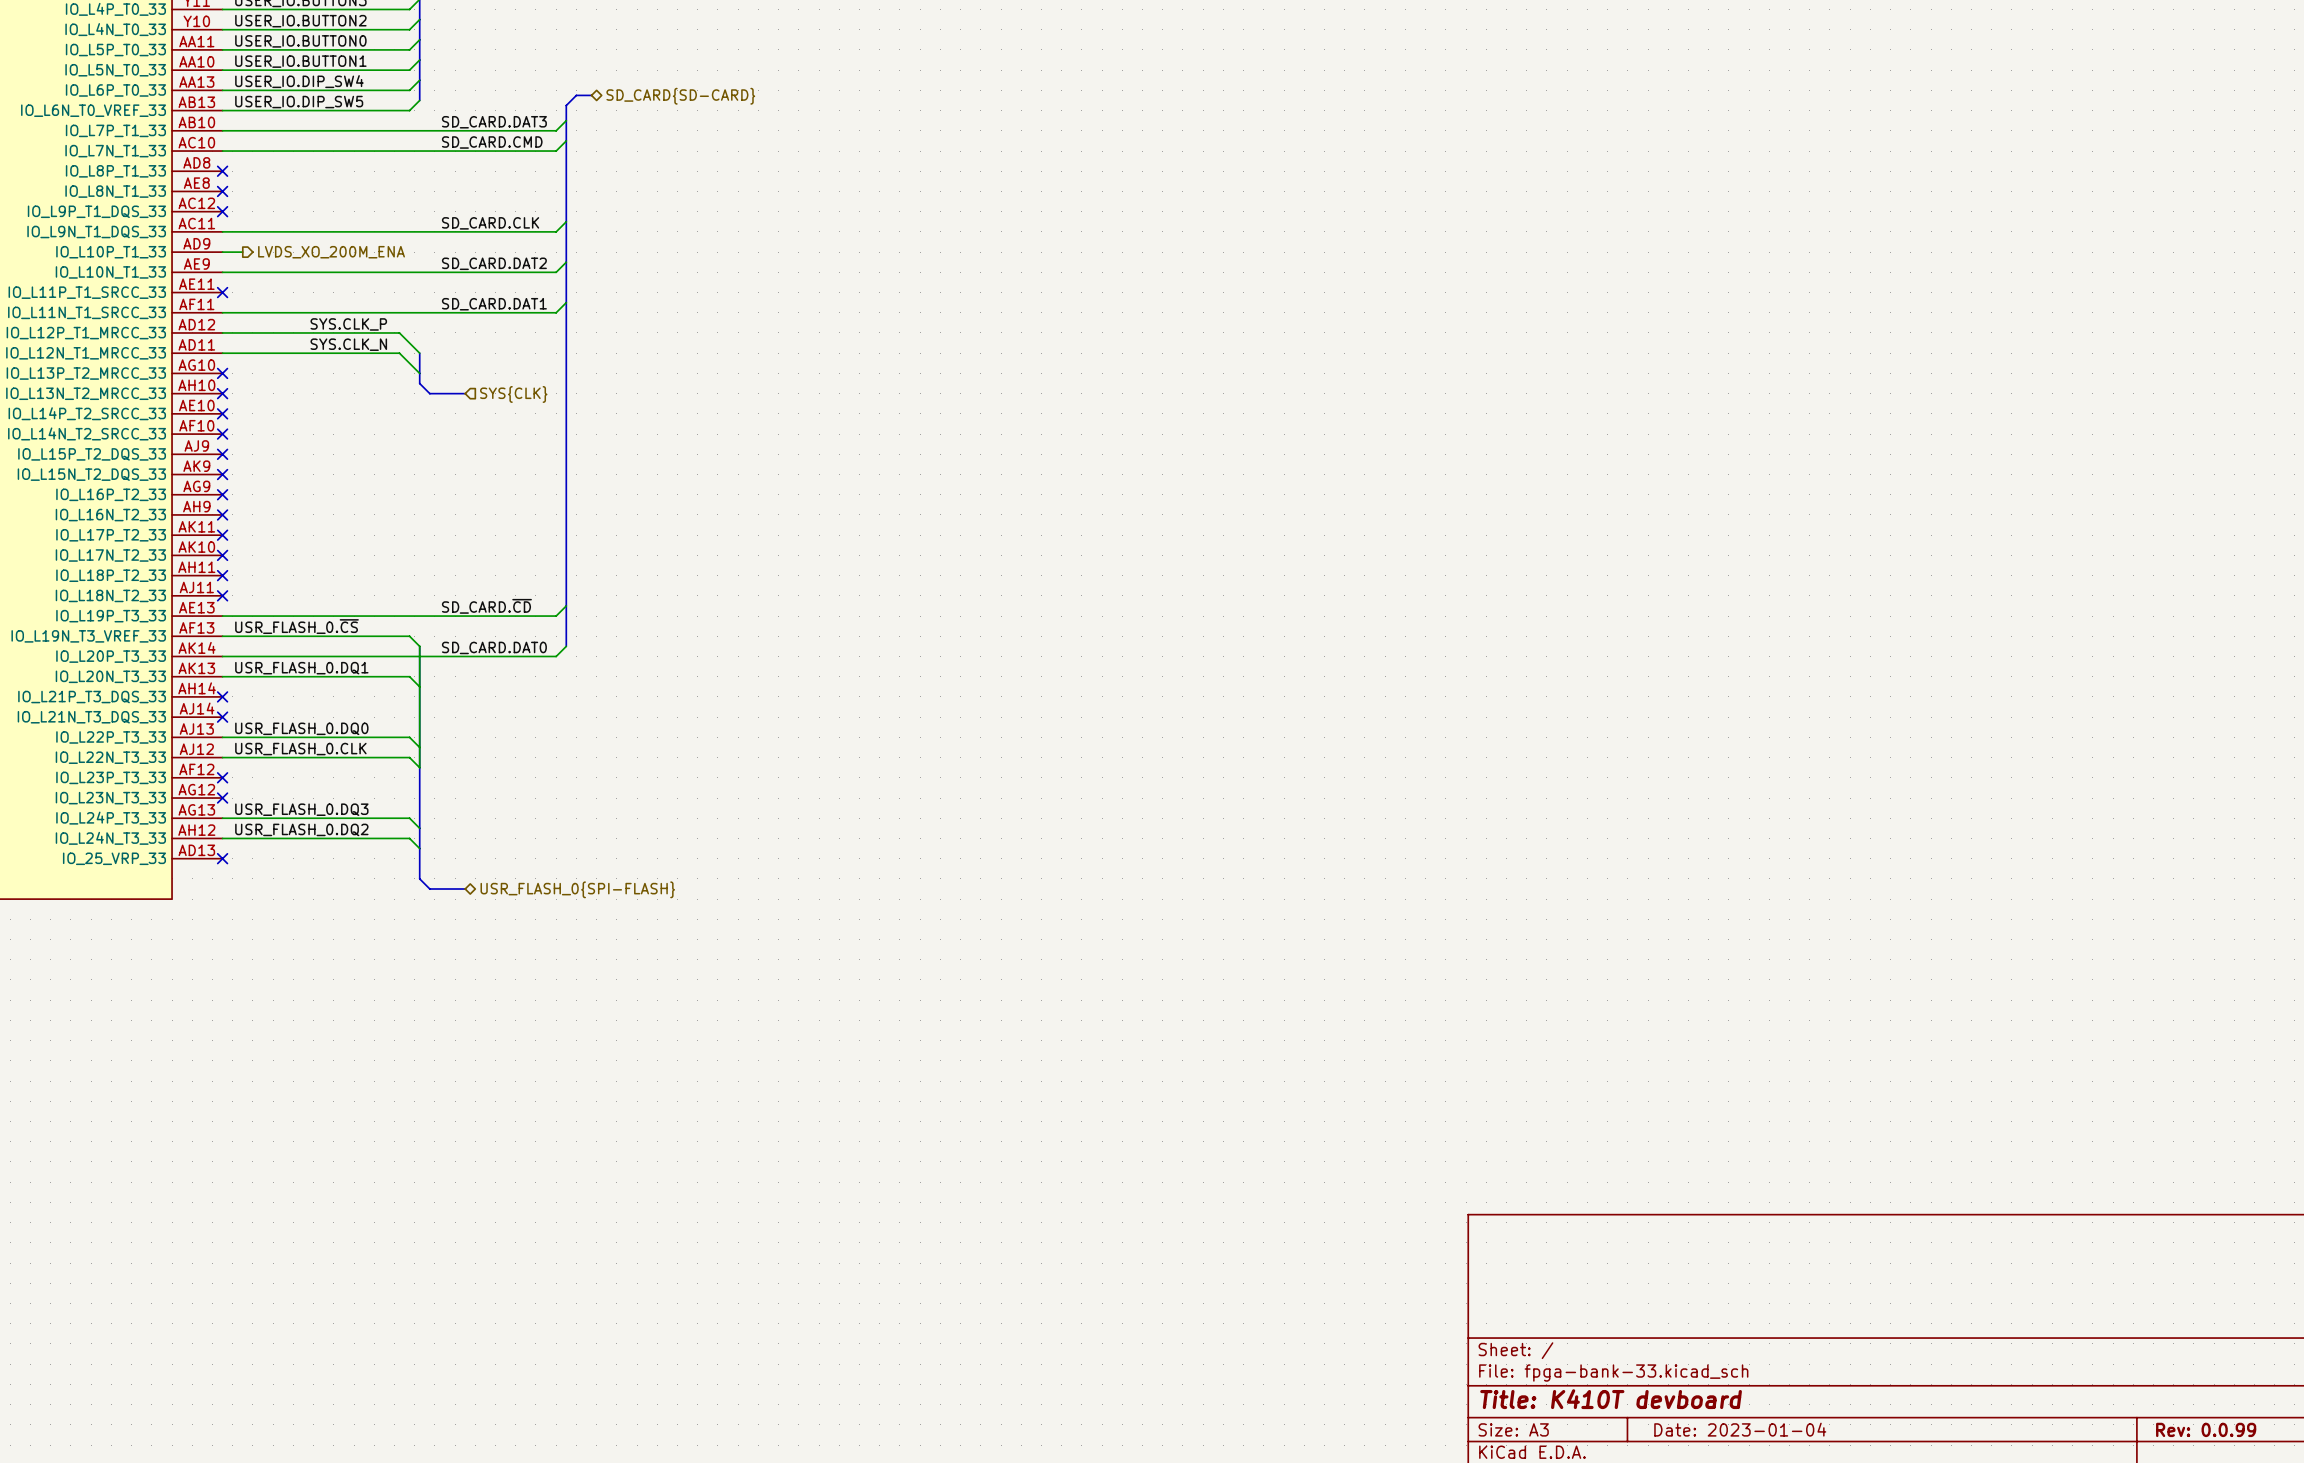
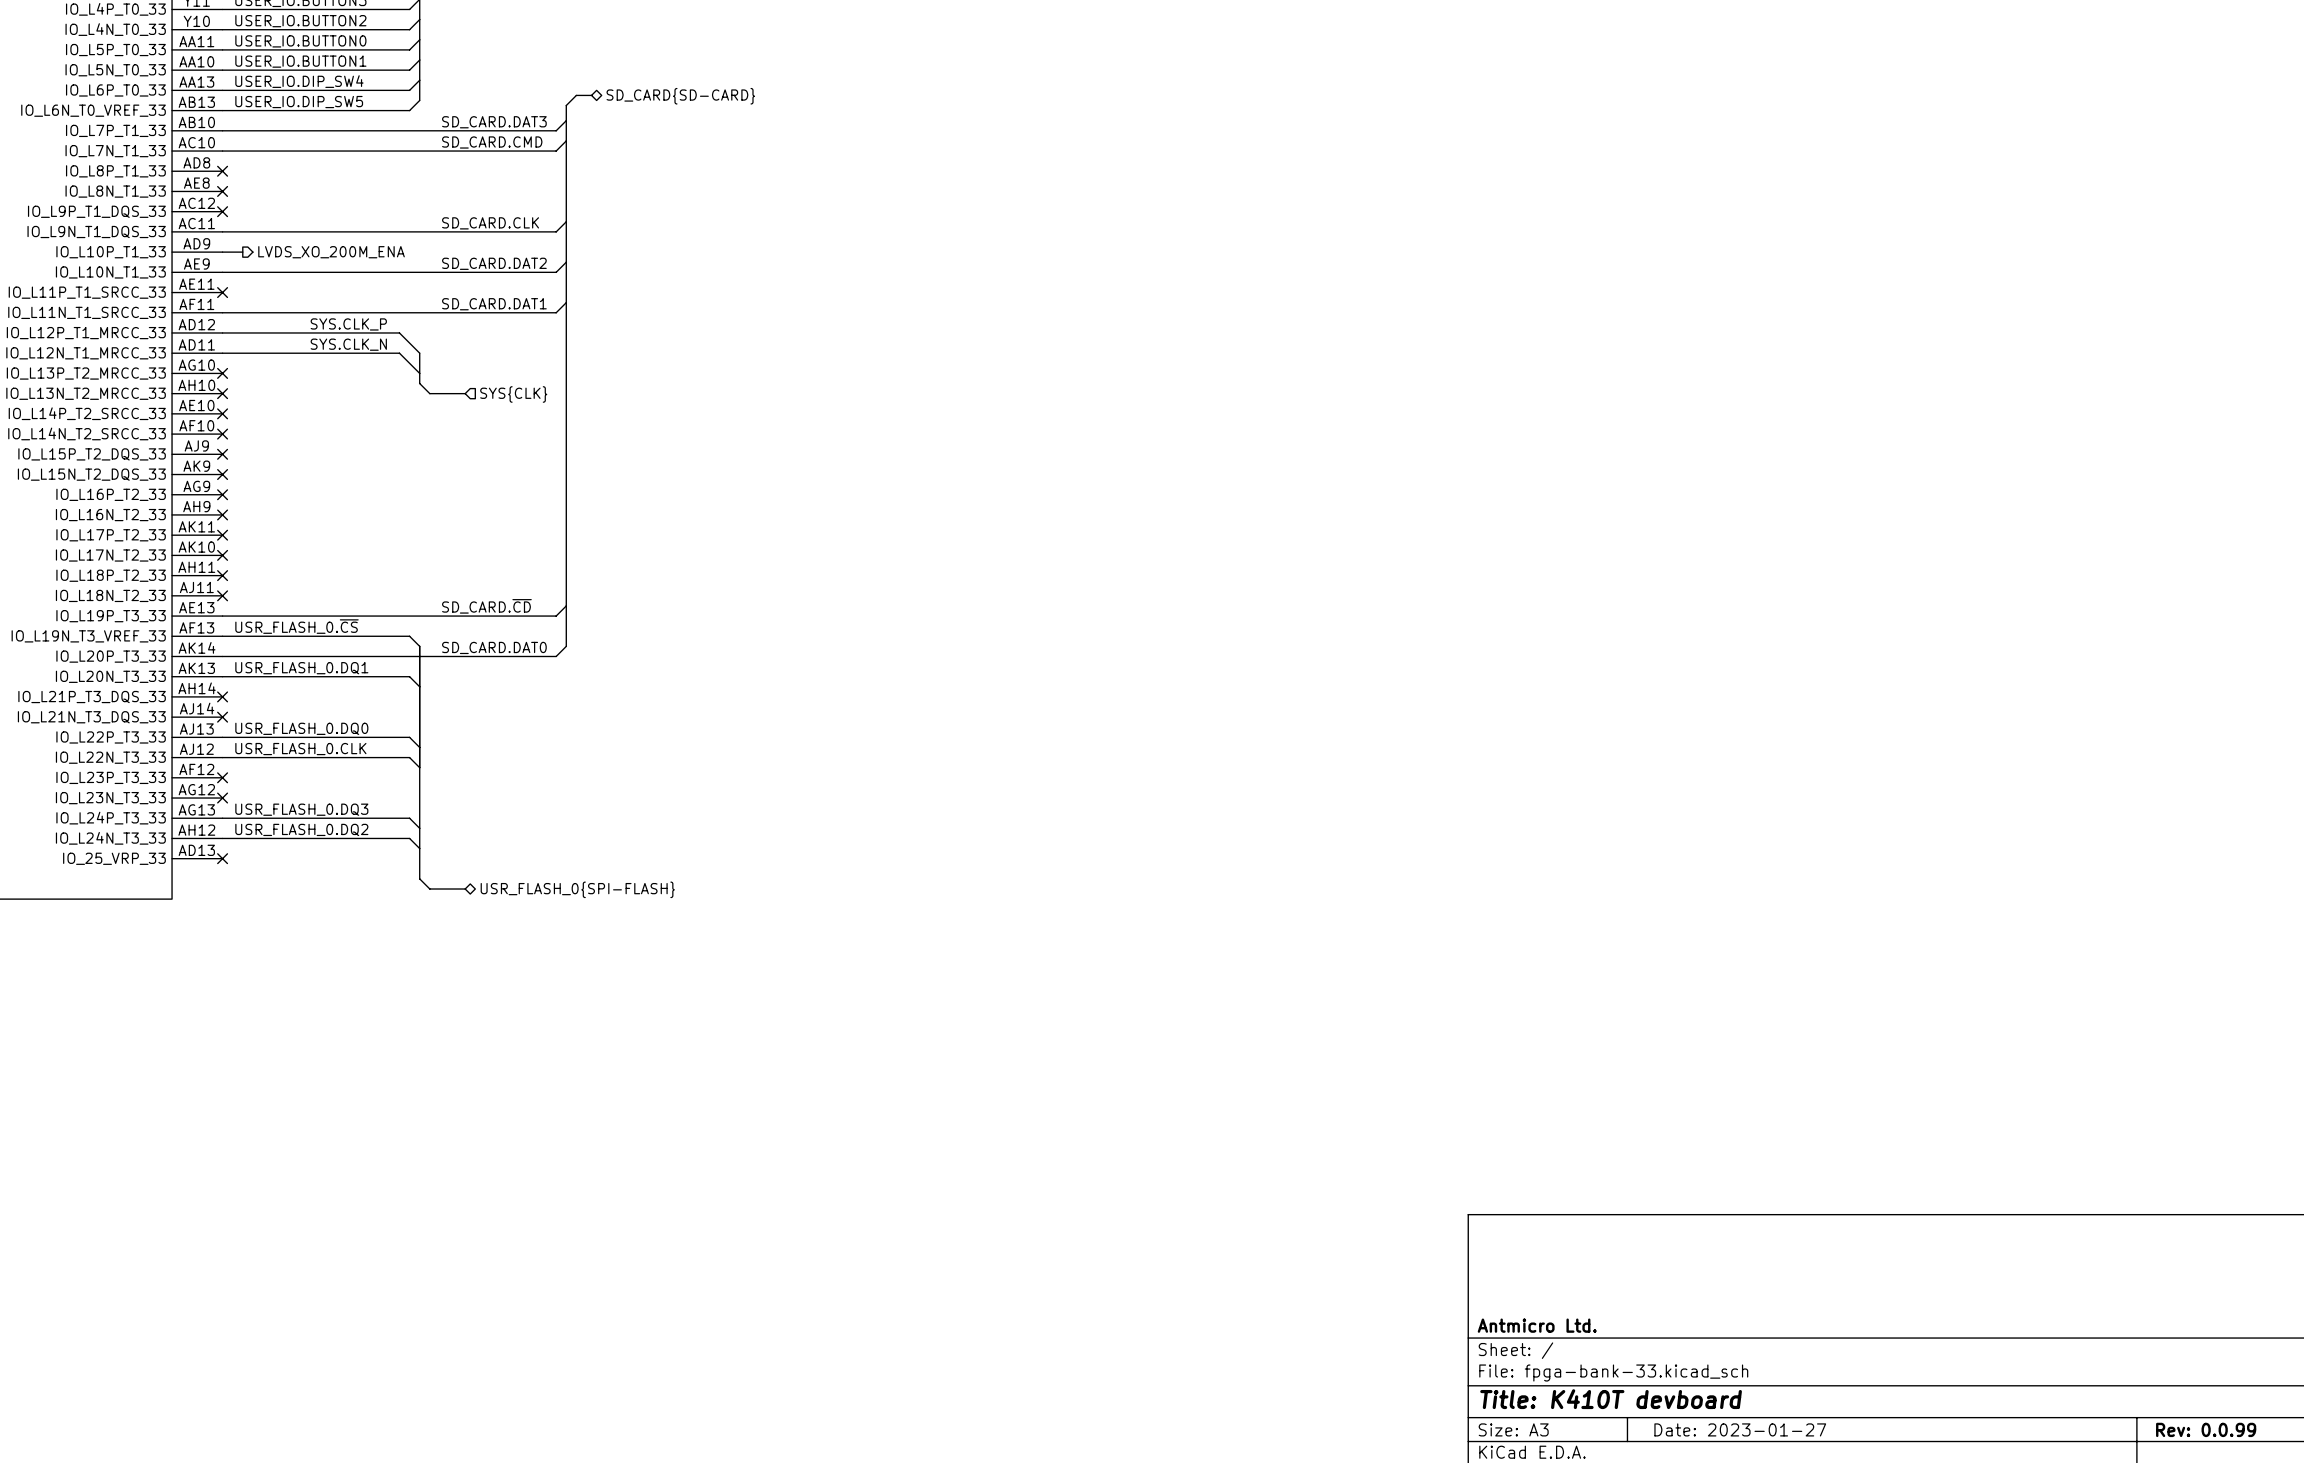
title block: none -> Antmicro Ltd. (1537, 1325)
title block: Date: 2023-01-04 (1740, 1429) -> Date: 2023-01-27 (1740, 1429)

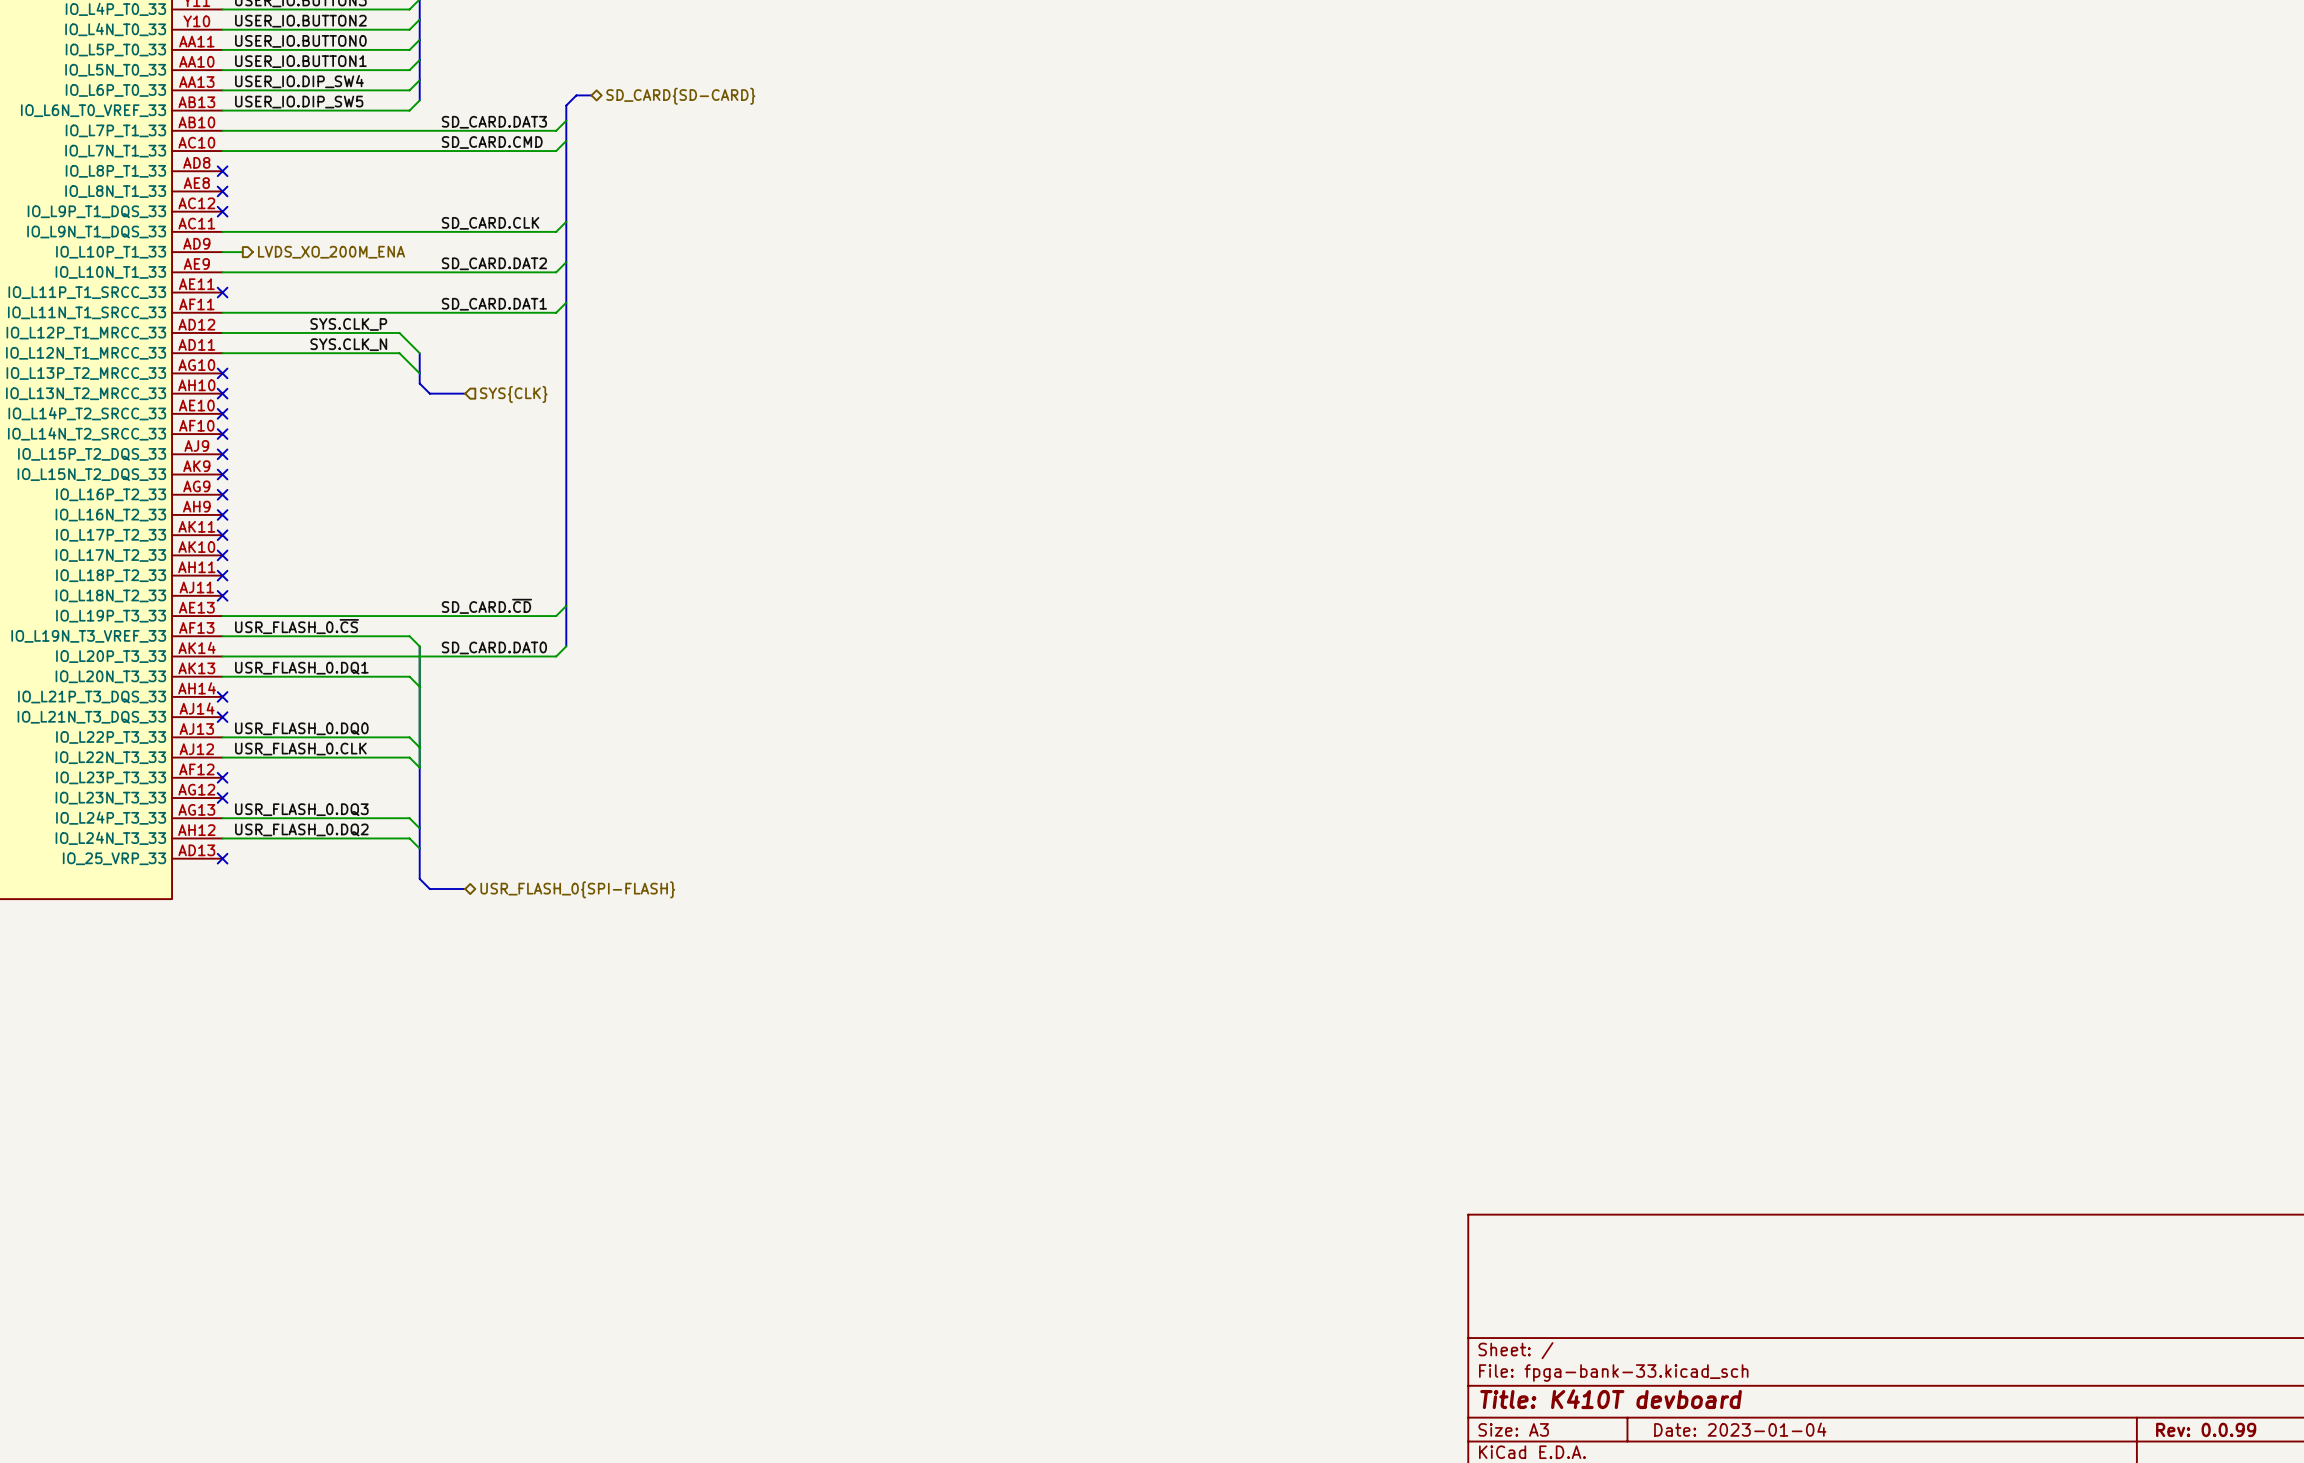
title block: Antmicro Ltd. (1537, 1325) -> none
title block: Date: 2023-01-27 (1740, 1429) -> Date: 2023-01-04 (1740, 1429)

